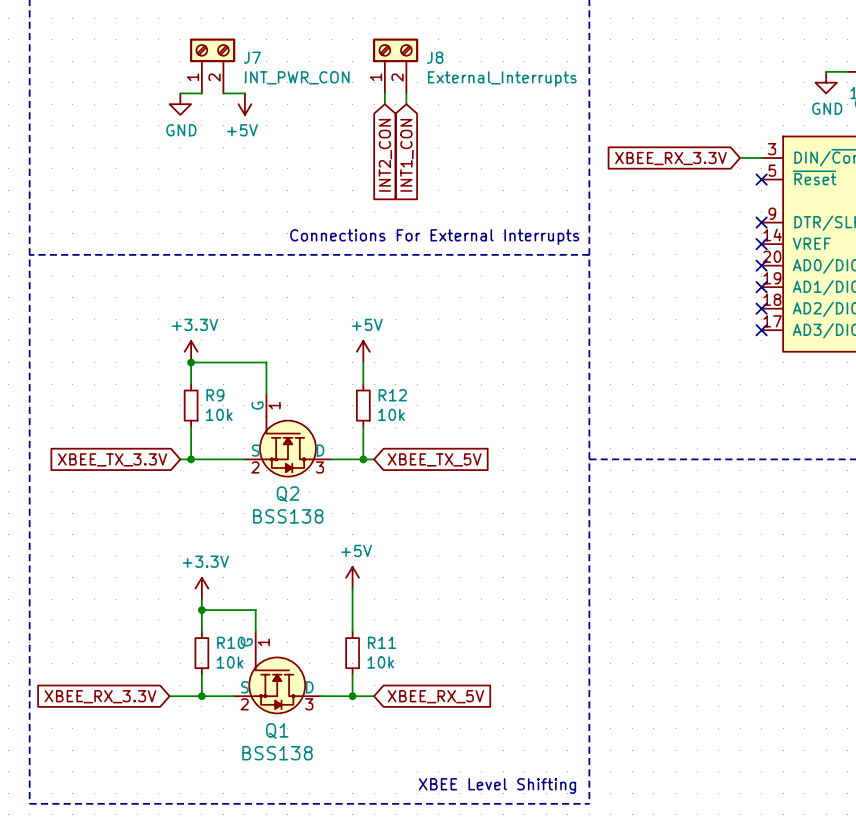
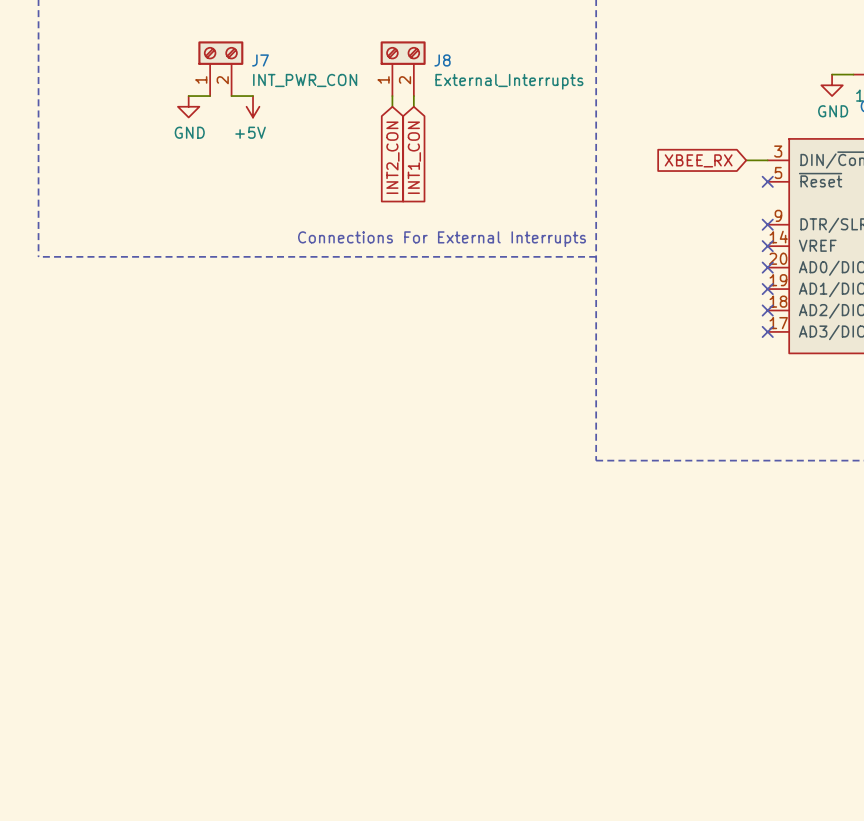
global label: XBEE_RX_3.3V (670, 158) -> XBEE_RX (698, 160)
line: (29, 254) (29, 803) (589, 803) (589, 459) -> none
power symbol: +3.3V (191, 351) -> none
power symbol: +5V (363, 351) -> none
junction: (191, 362) -> none
wire: (363, 362) (363, 384) -> none
wire: (191, 384) (191, 362) (266, 362) (266, 394) -> none
R9: 10k (191, 405) -> none
R12: 10k (363, 405) -> none
wire: (191, 427) (191, 459) -> none
wire: (363, 427) (363, 459) -> none
Q2: BSS138 (287, 435) -> none
global label: XBEE_TX_3.3V (112, 459) -> none
wire: (180, 459) (244, 459) -> none
junction: (191, 459) -> none
wire: (331, 459) (374, 459) -> none
junction: (363, 459) -> none
global label: XBEE_TX_5V (434, 459) -> none
power symbol: +5V (352, 577) -> none
power symbol: +3.3V (201, 588) -> none
wire: (352, 588) (352, 631) -> none
wire: (201, 599) (201, 631) -> none
wire: (201, 610) (255, 610) (255, 631) -> none
junction: (201, 610) -> none
R10: 10k (201, 653) -> none
R11: 10k (352, 653) -> none
Q1: BSS138 (277, 672) -> none
wire: (201, 674) (201, 696) -> none
wire: (352, 674) (352, 696) -> none
global label: XBEE_RX_3.3V (100, 696) -> none
wire: (169, 696) (234, 696) -> none
junction: (201, 696) -> none
wire: (320, 696) (374, 696) -> none
junction: (352, 696) -> none
global label: XBEE_RX_5V (436, 696) -> none
text: XBEE Level Shifting (497, 786) -> none

